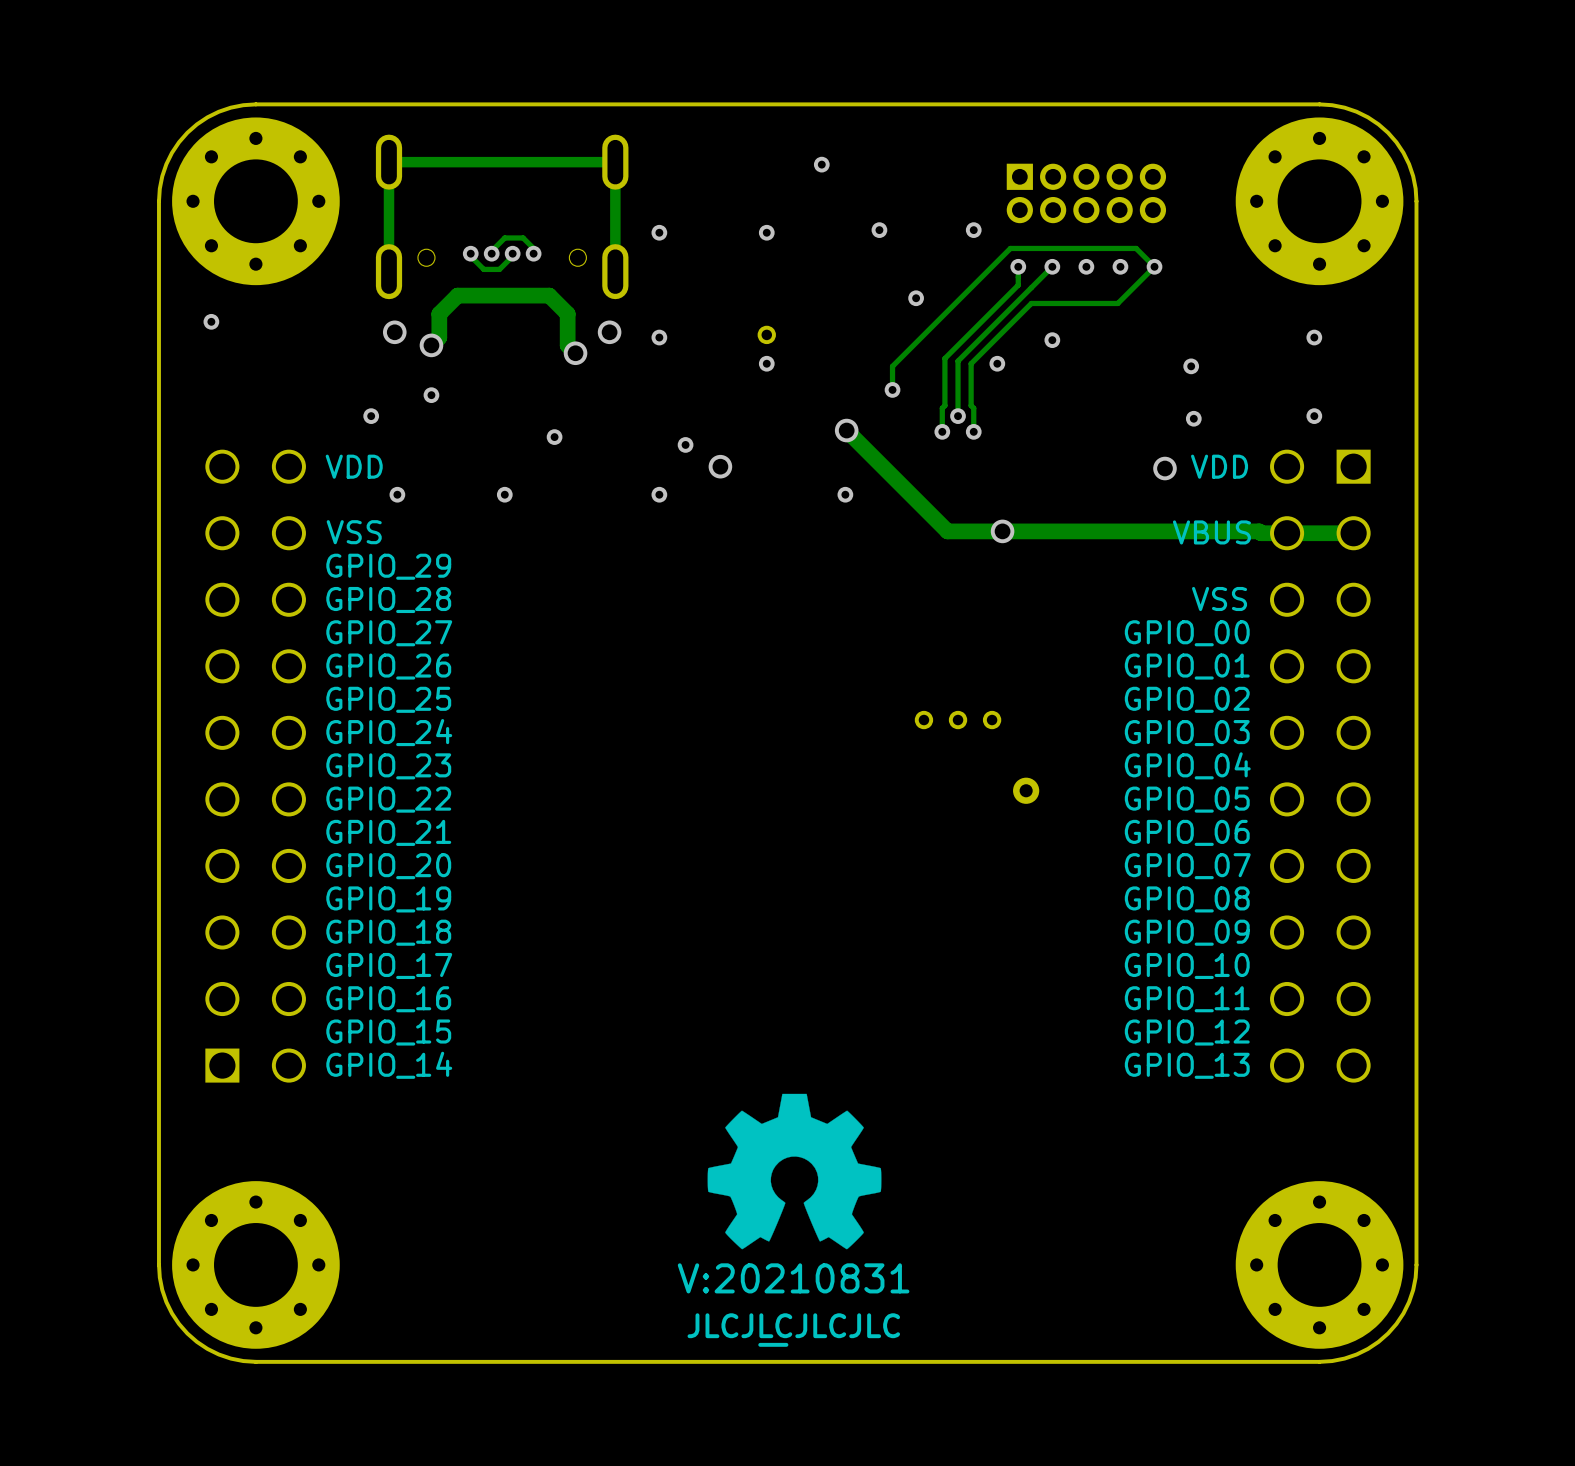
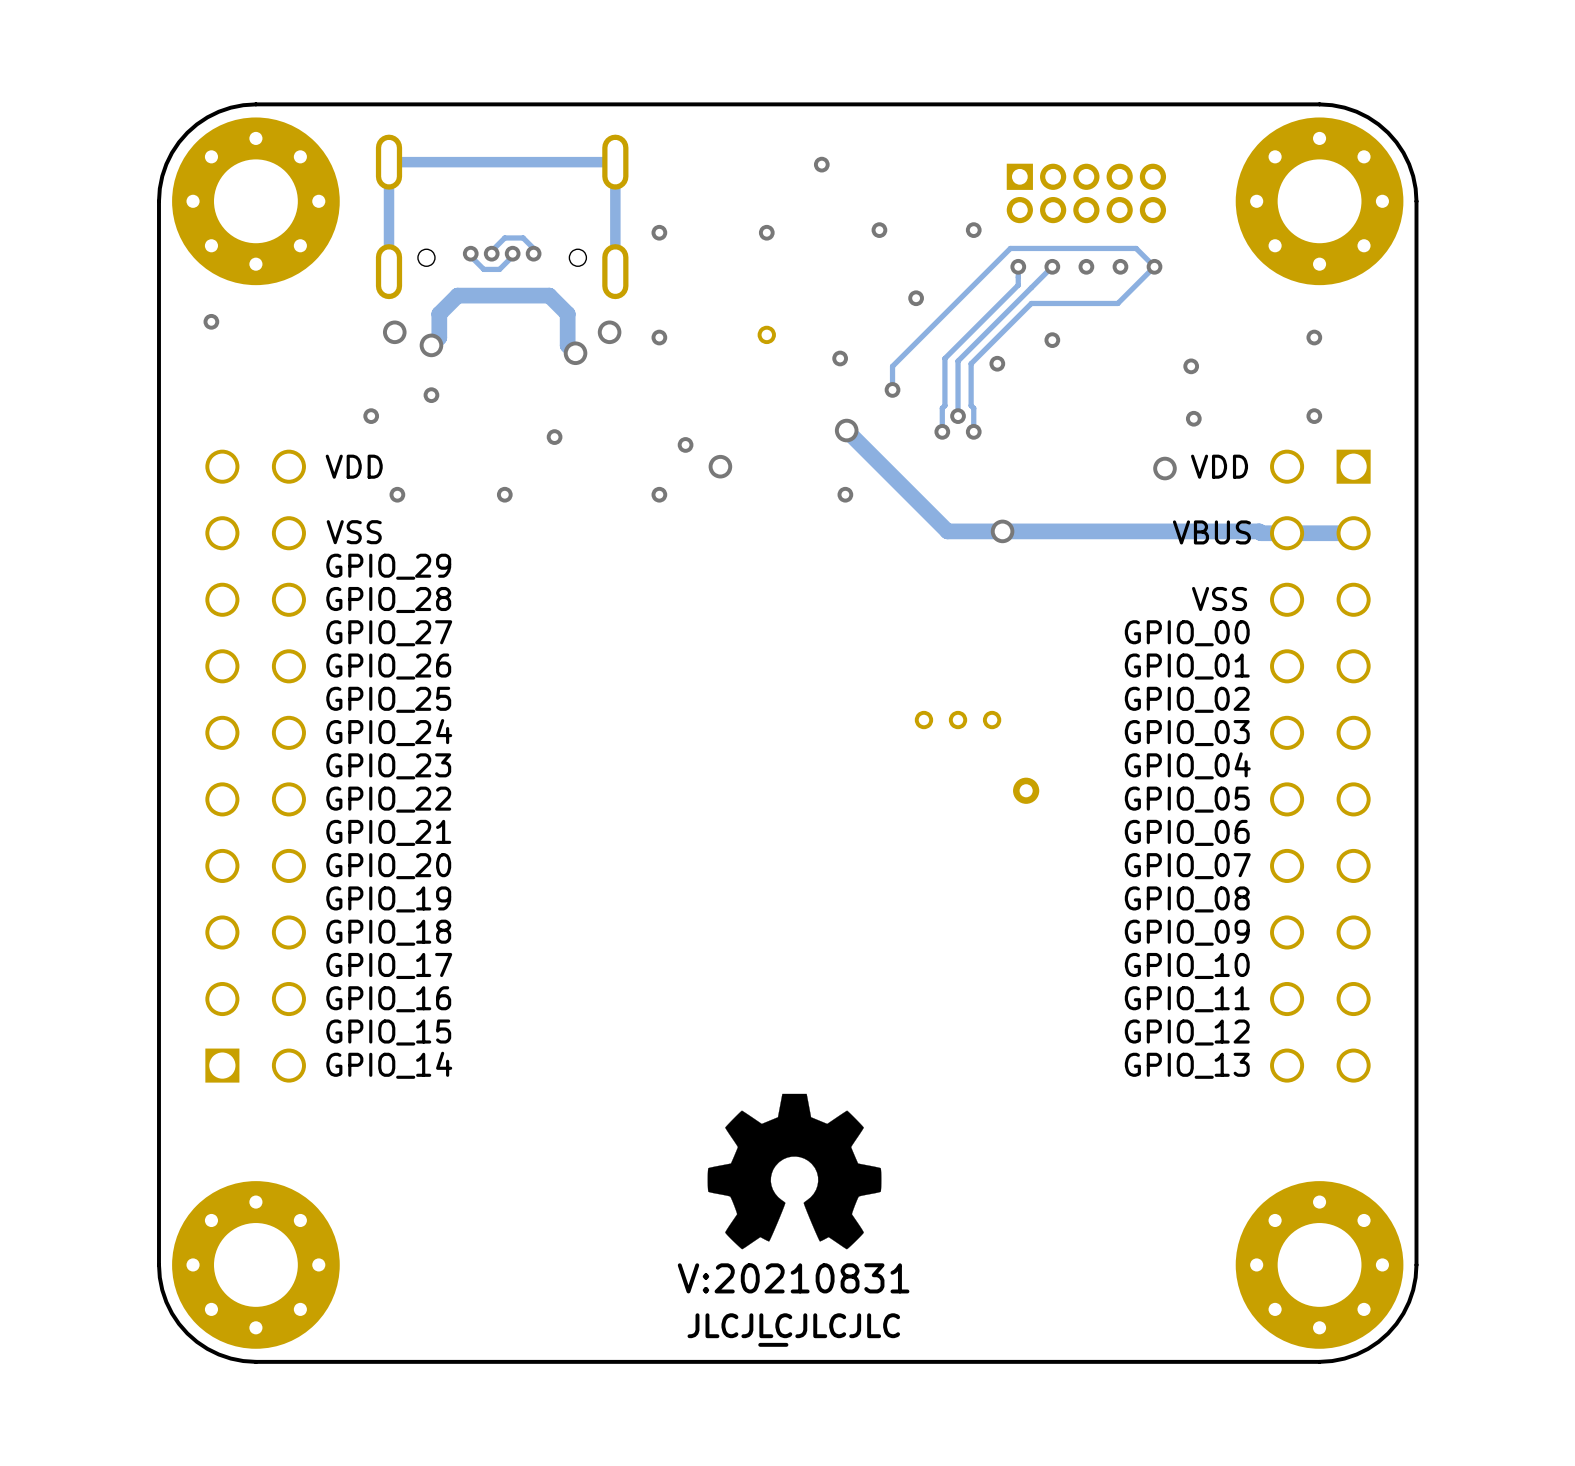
via position: (766, 363) -> (840, 358)

